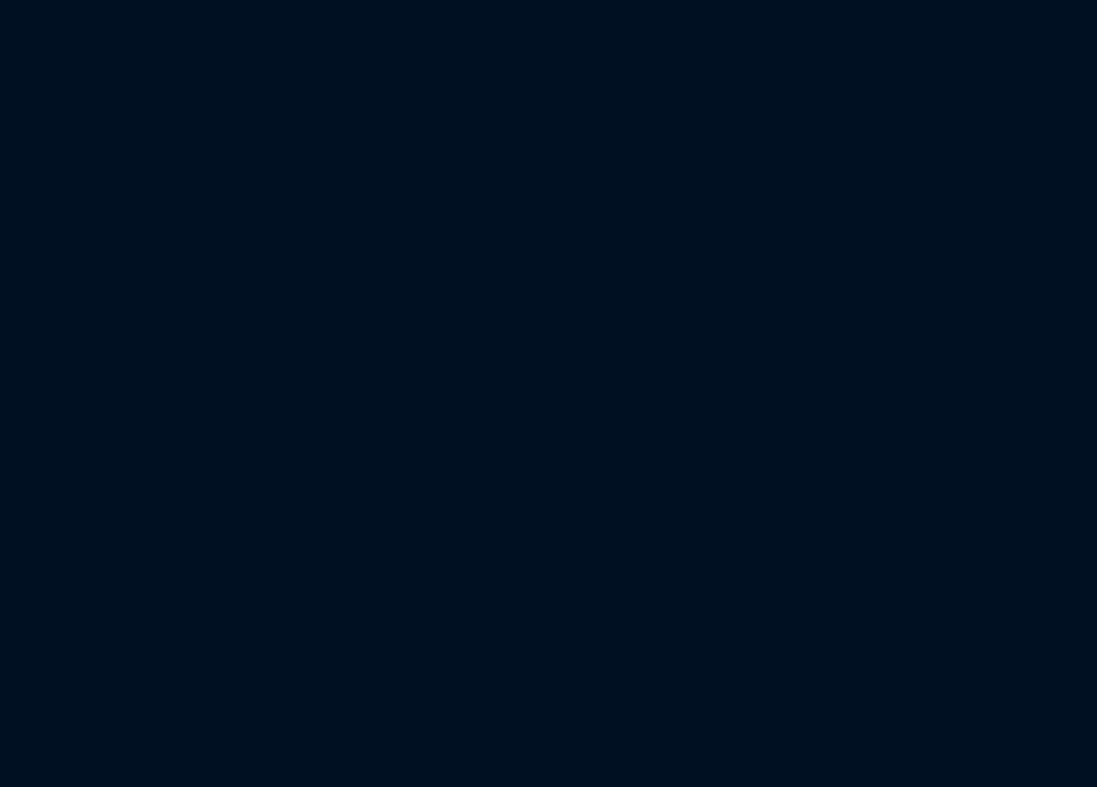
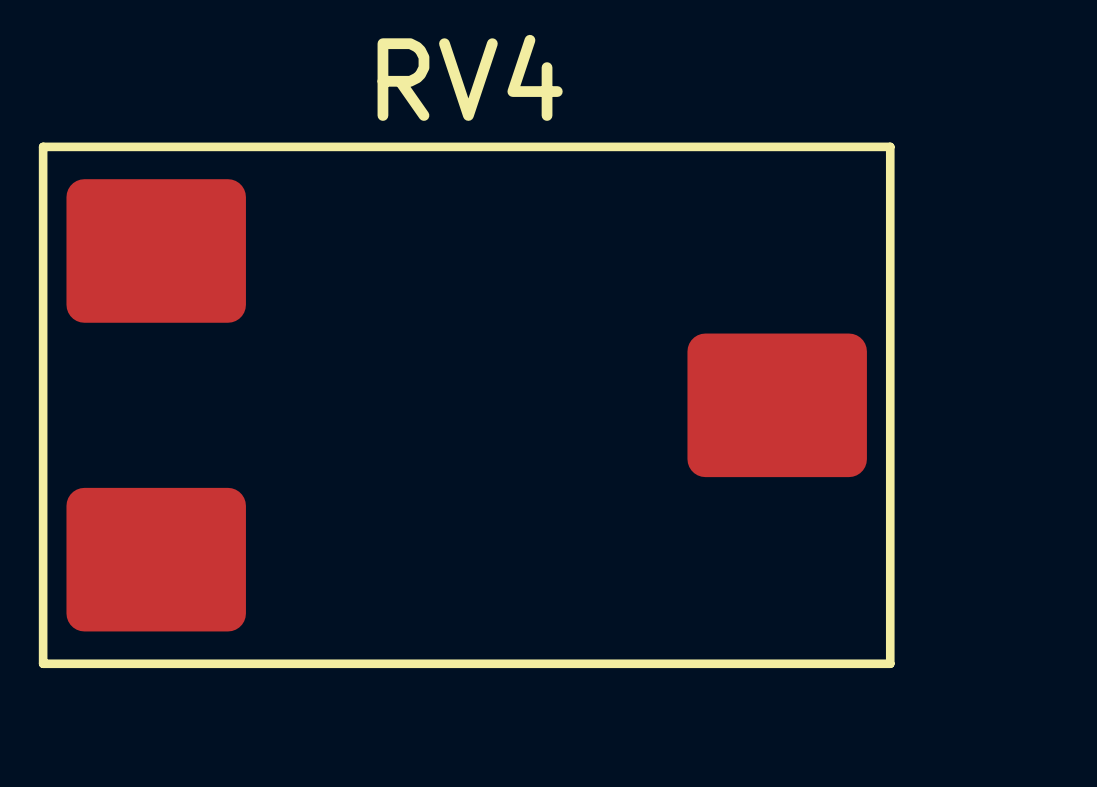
RV4: none -> (466, 405)

